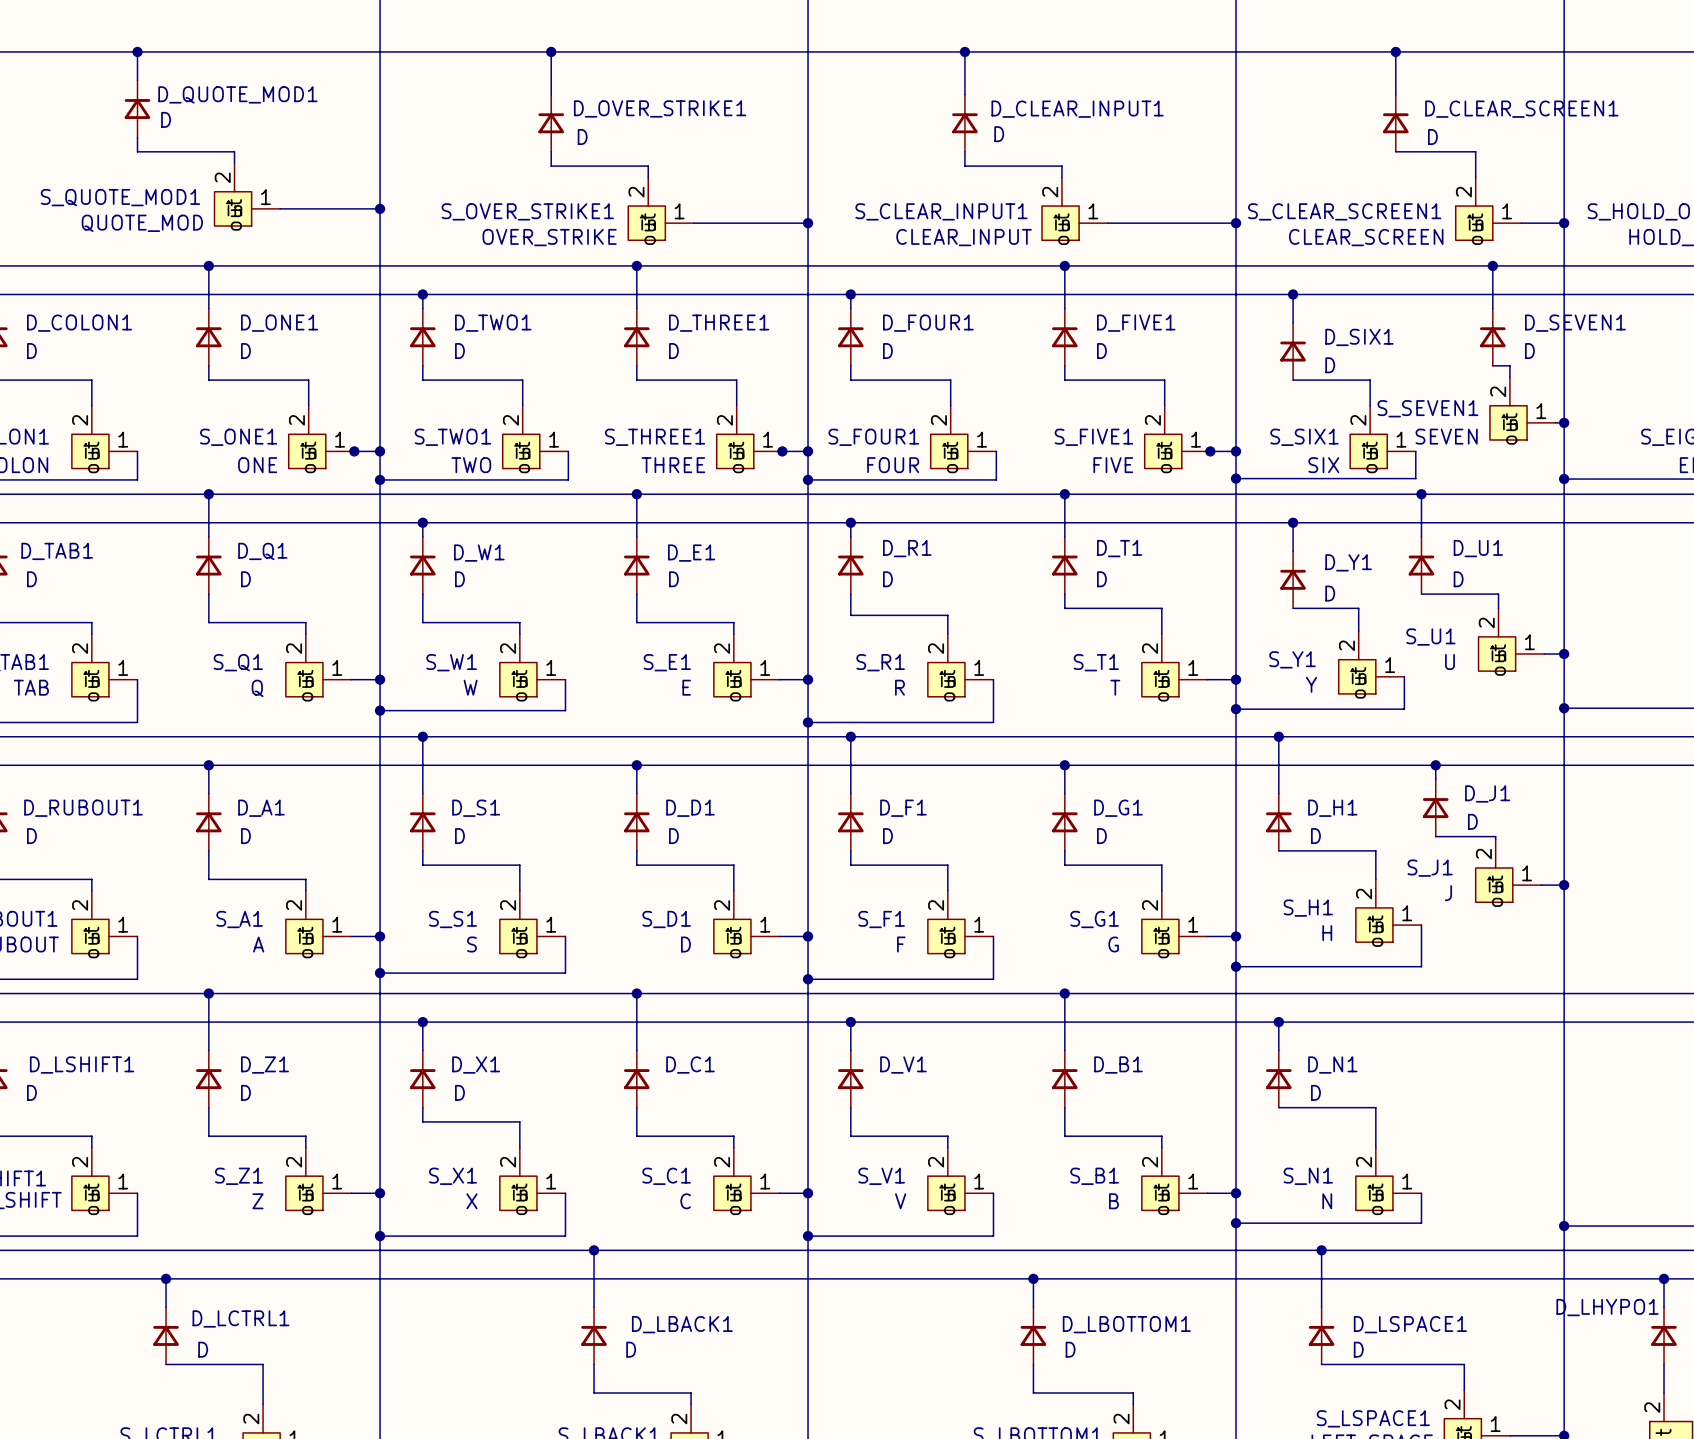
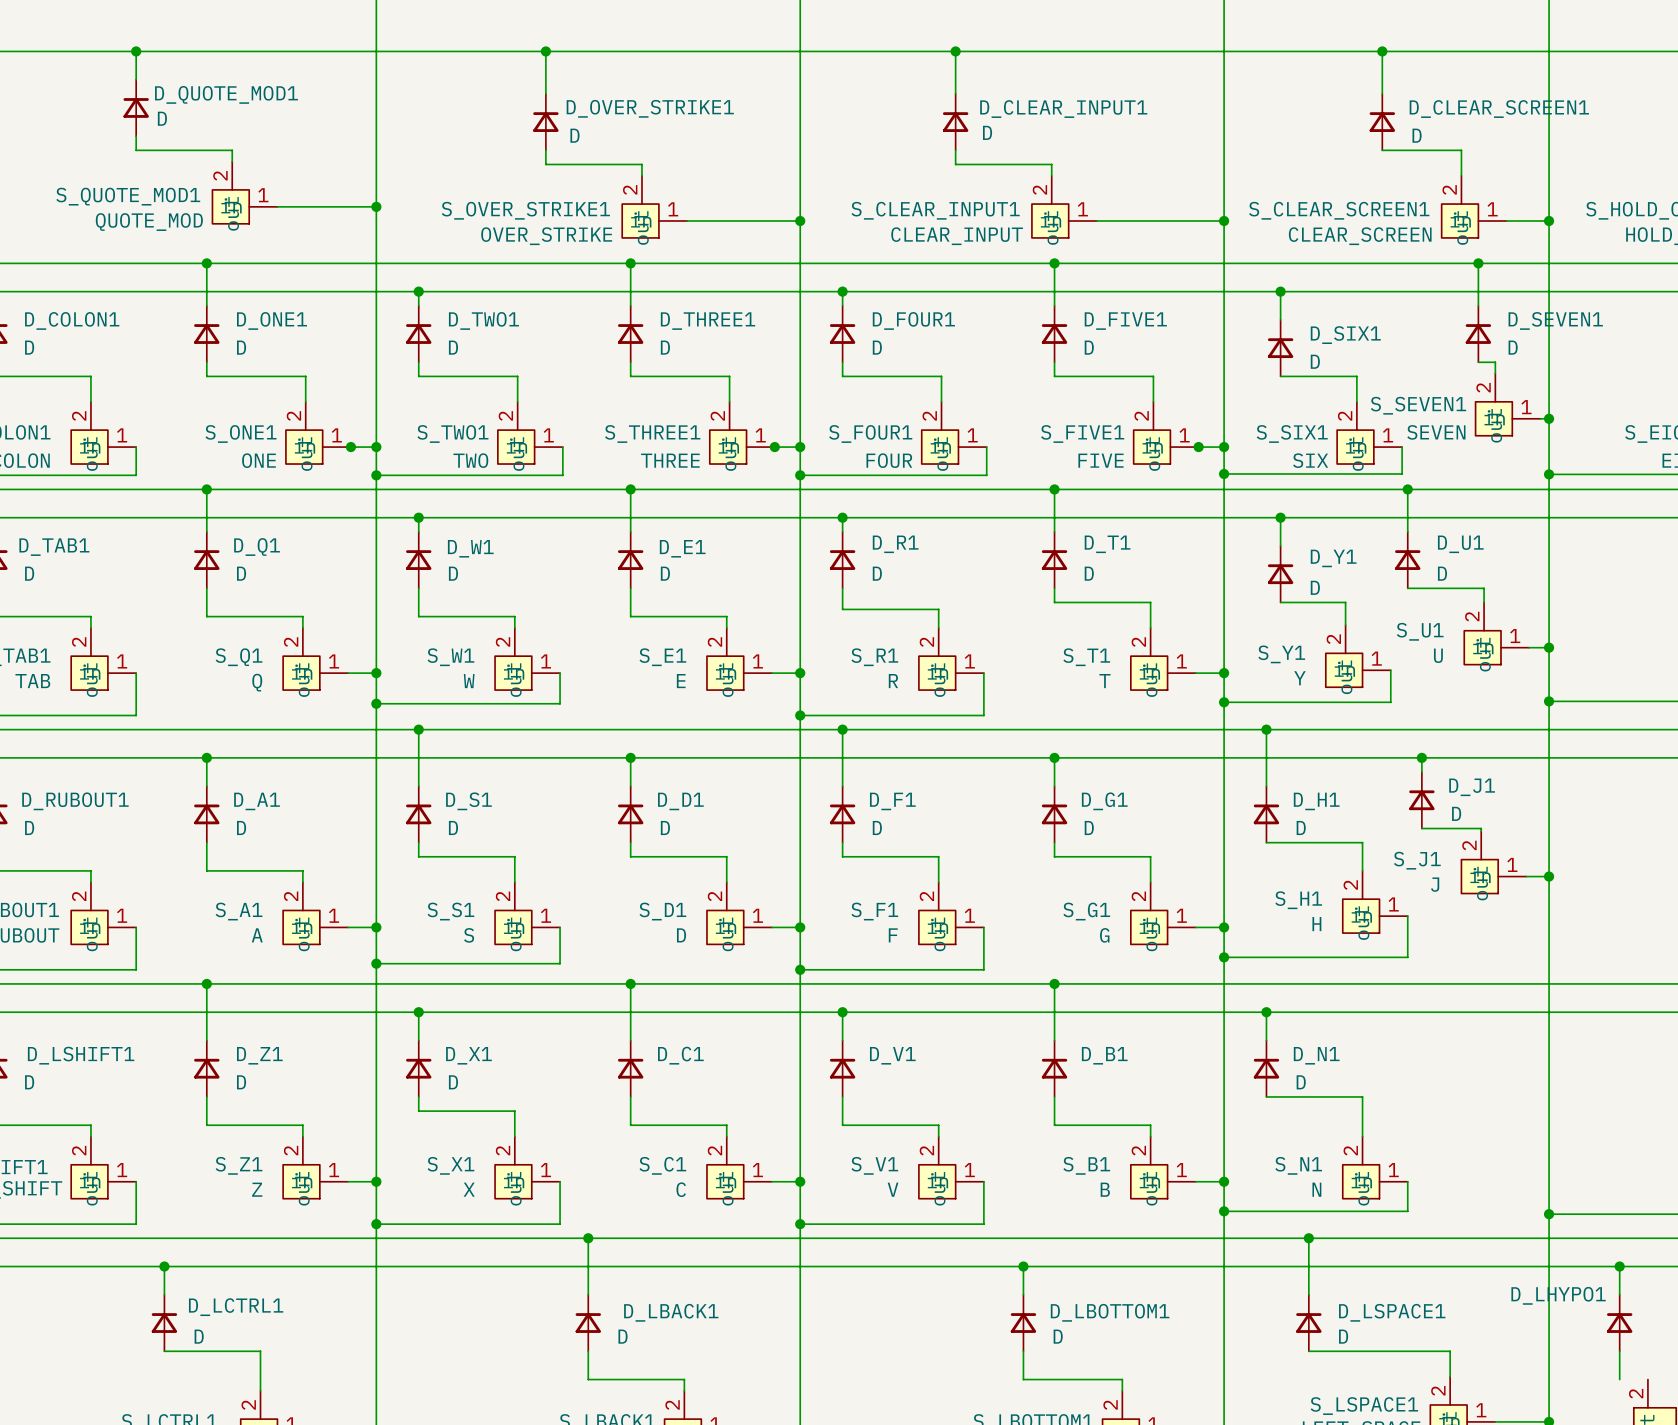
wire: (1664, 1278) (1664, 1307) -> (1619, 1266) (1619, 1294)
junction position: (1664, 1278) -> (1619, 1266)
D_LHYPO1 position: (1664, 1335) -> (1619, 1323)
wire: (1664, 1364) (1664, 1393) -> (1619, 1351) (1619, 1379)

